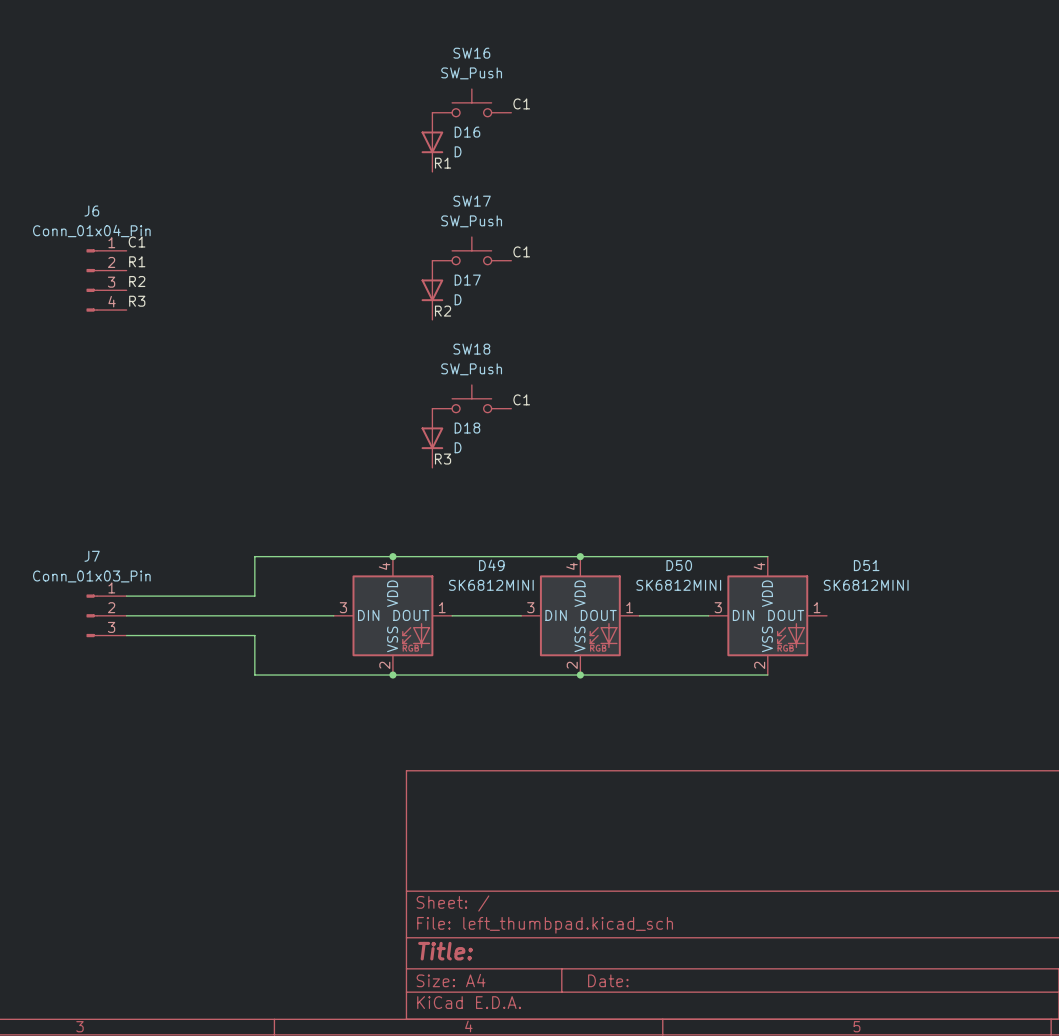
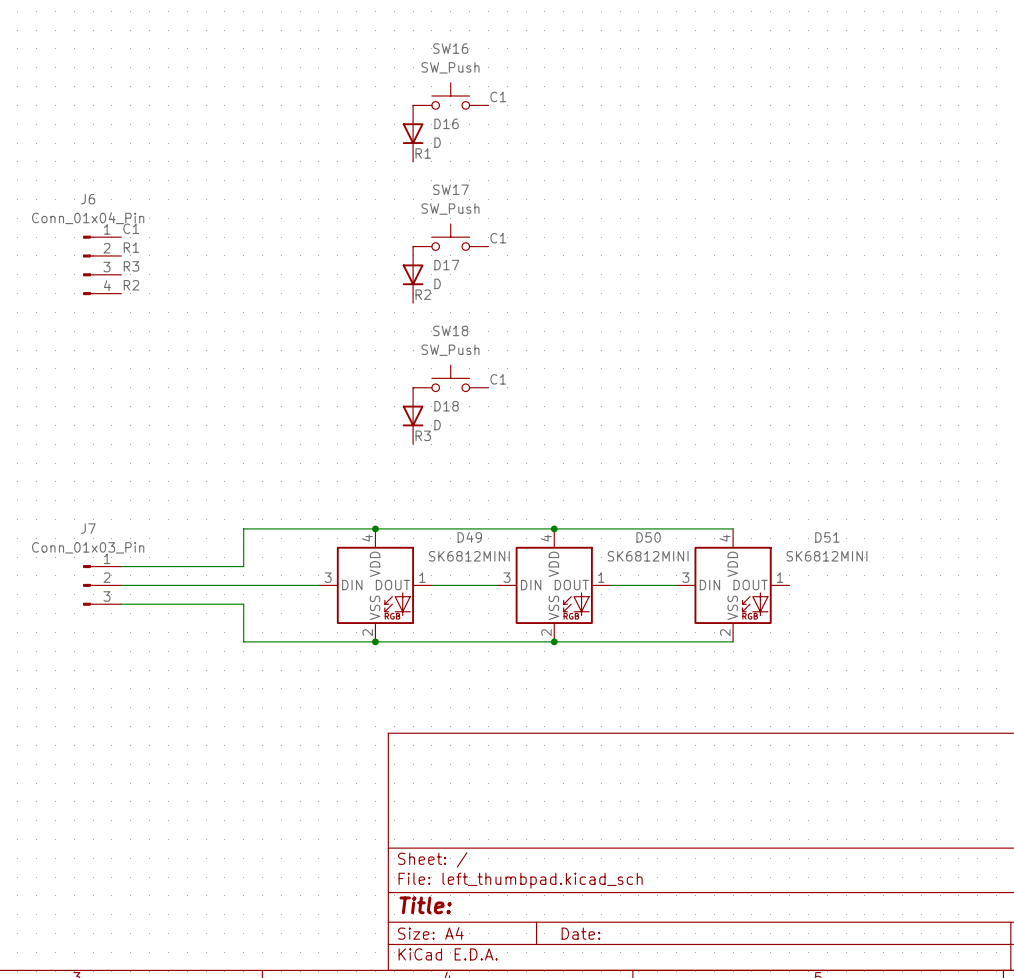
label: R2 (137, 281) -> R3 (131, 266)
label: R3 (137, 301) -> R2 (131, 285)

